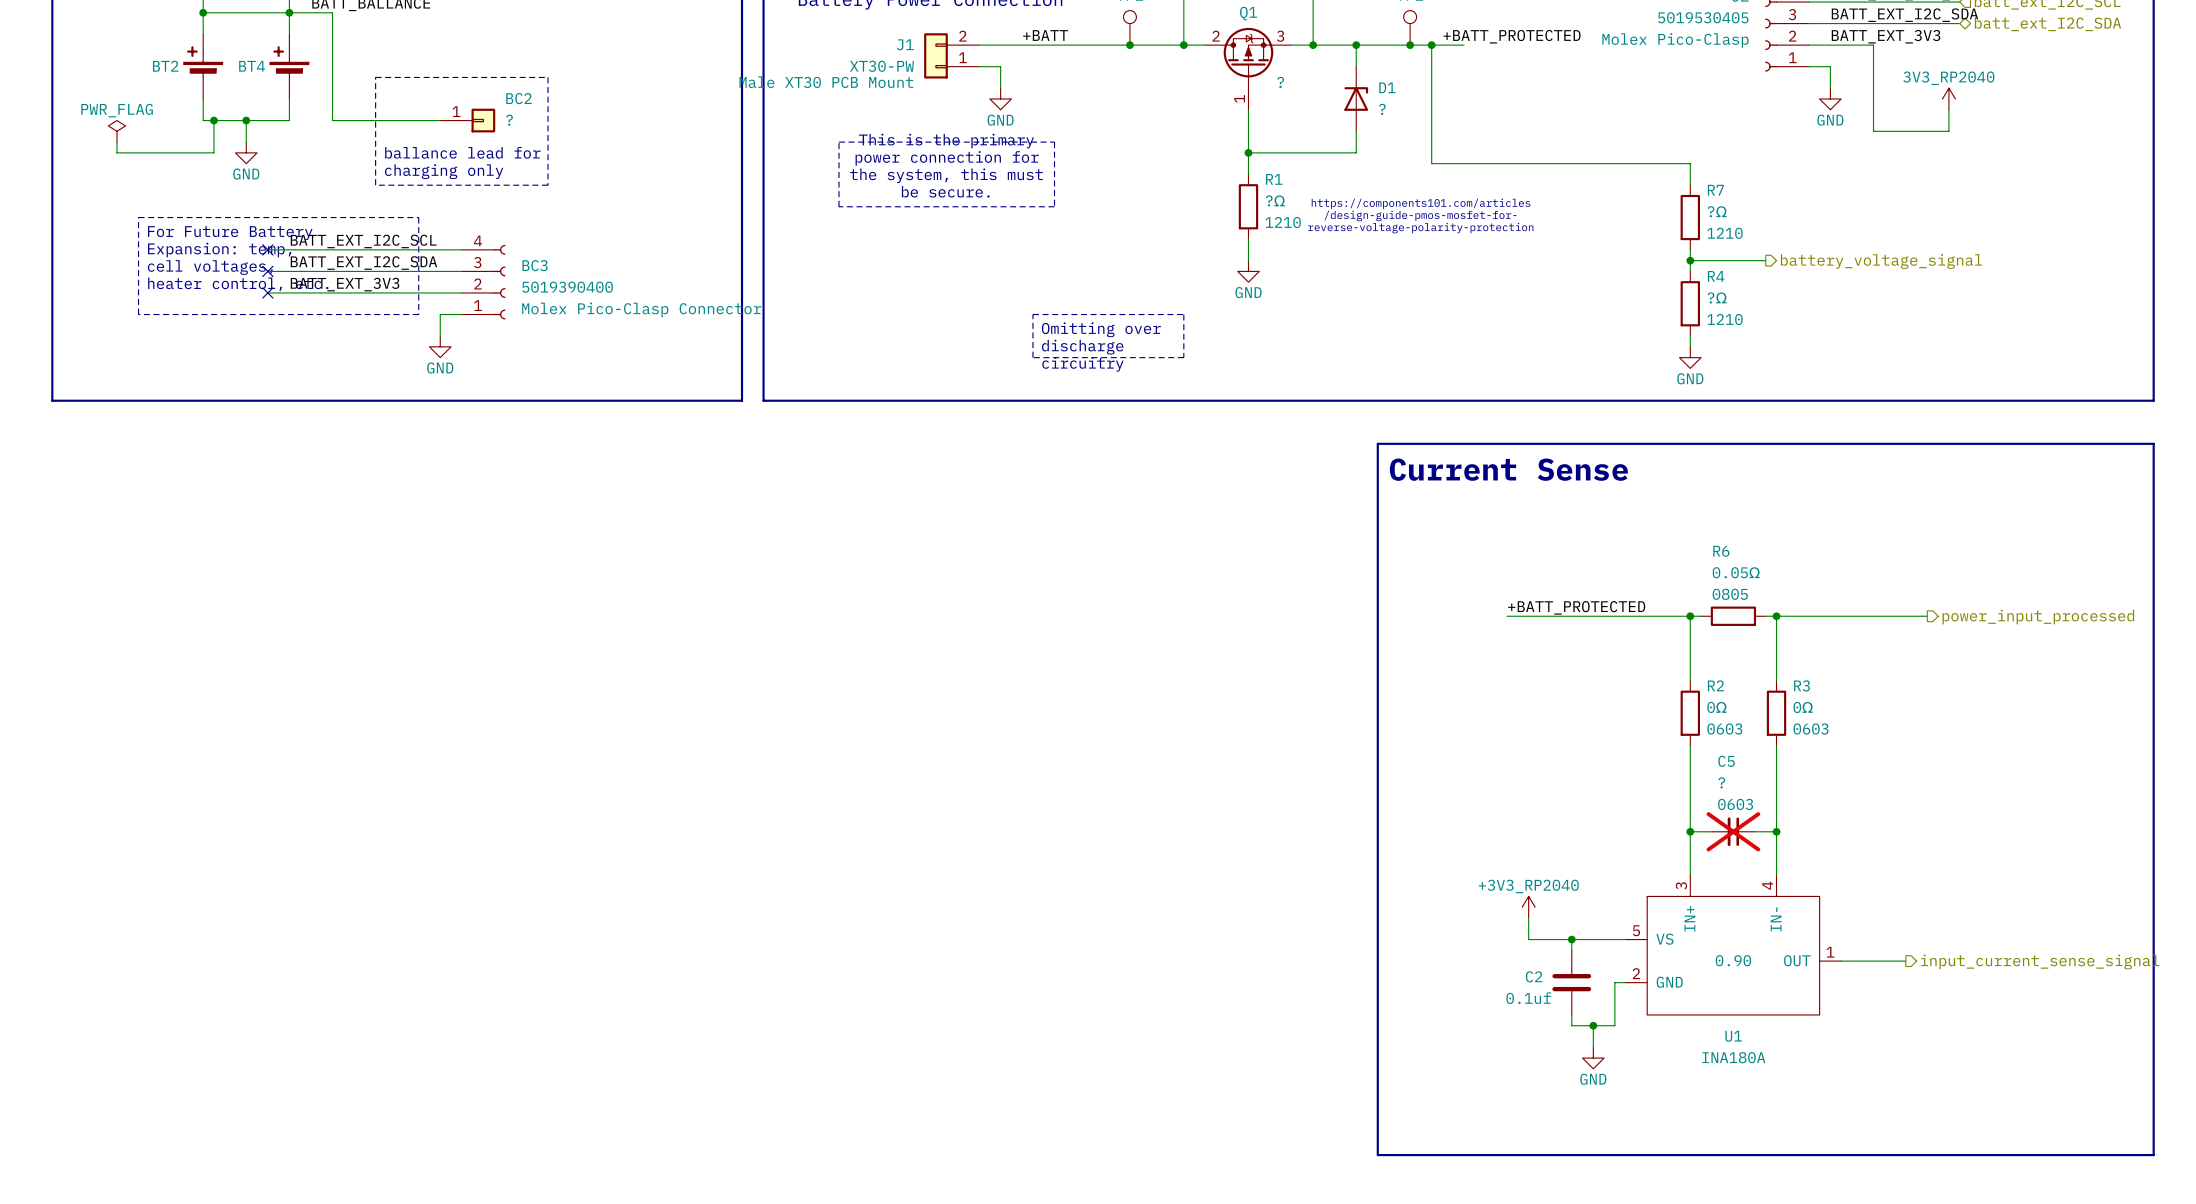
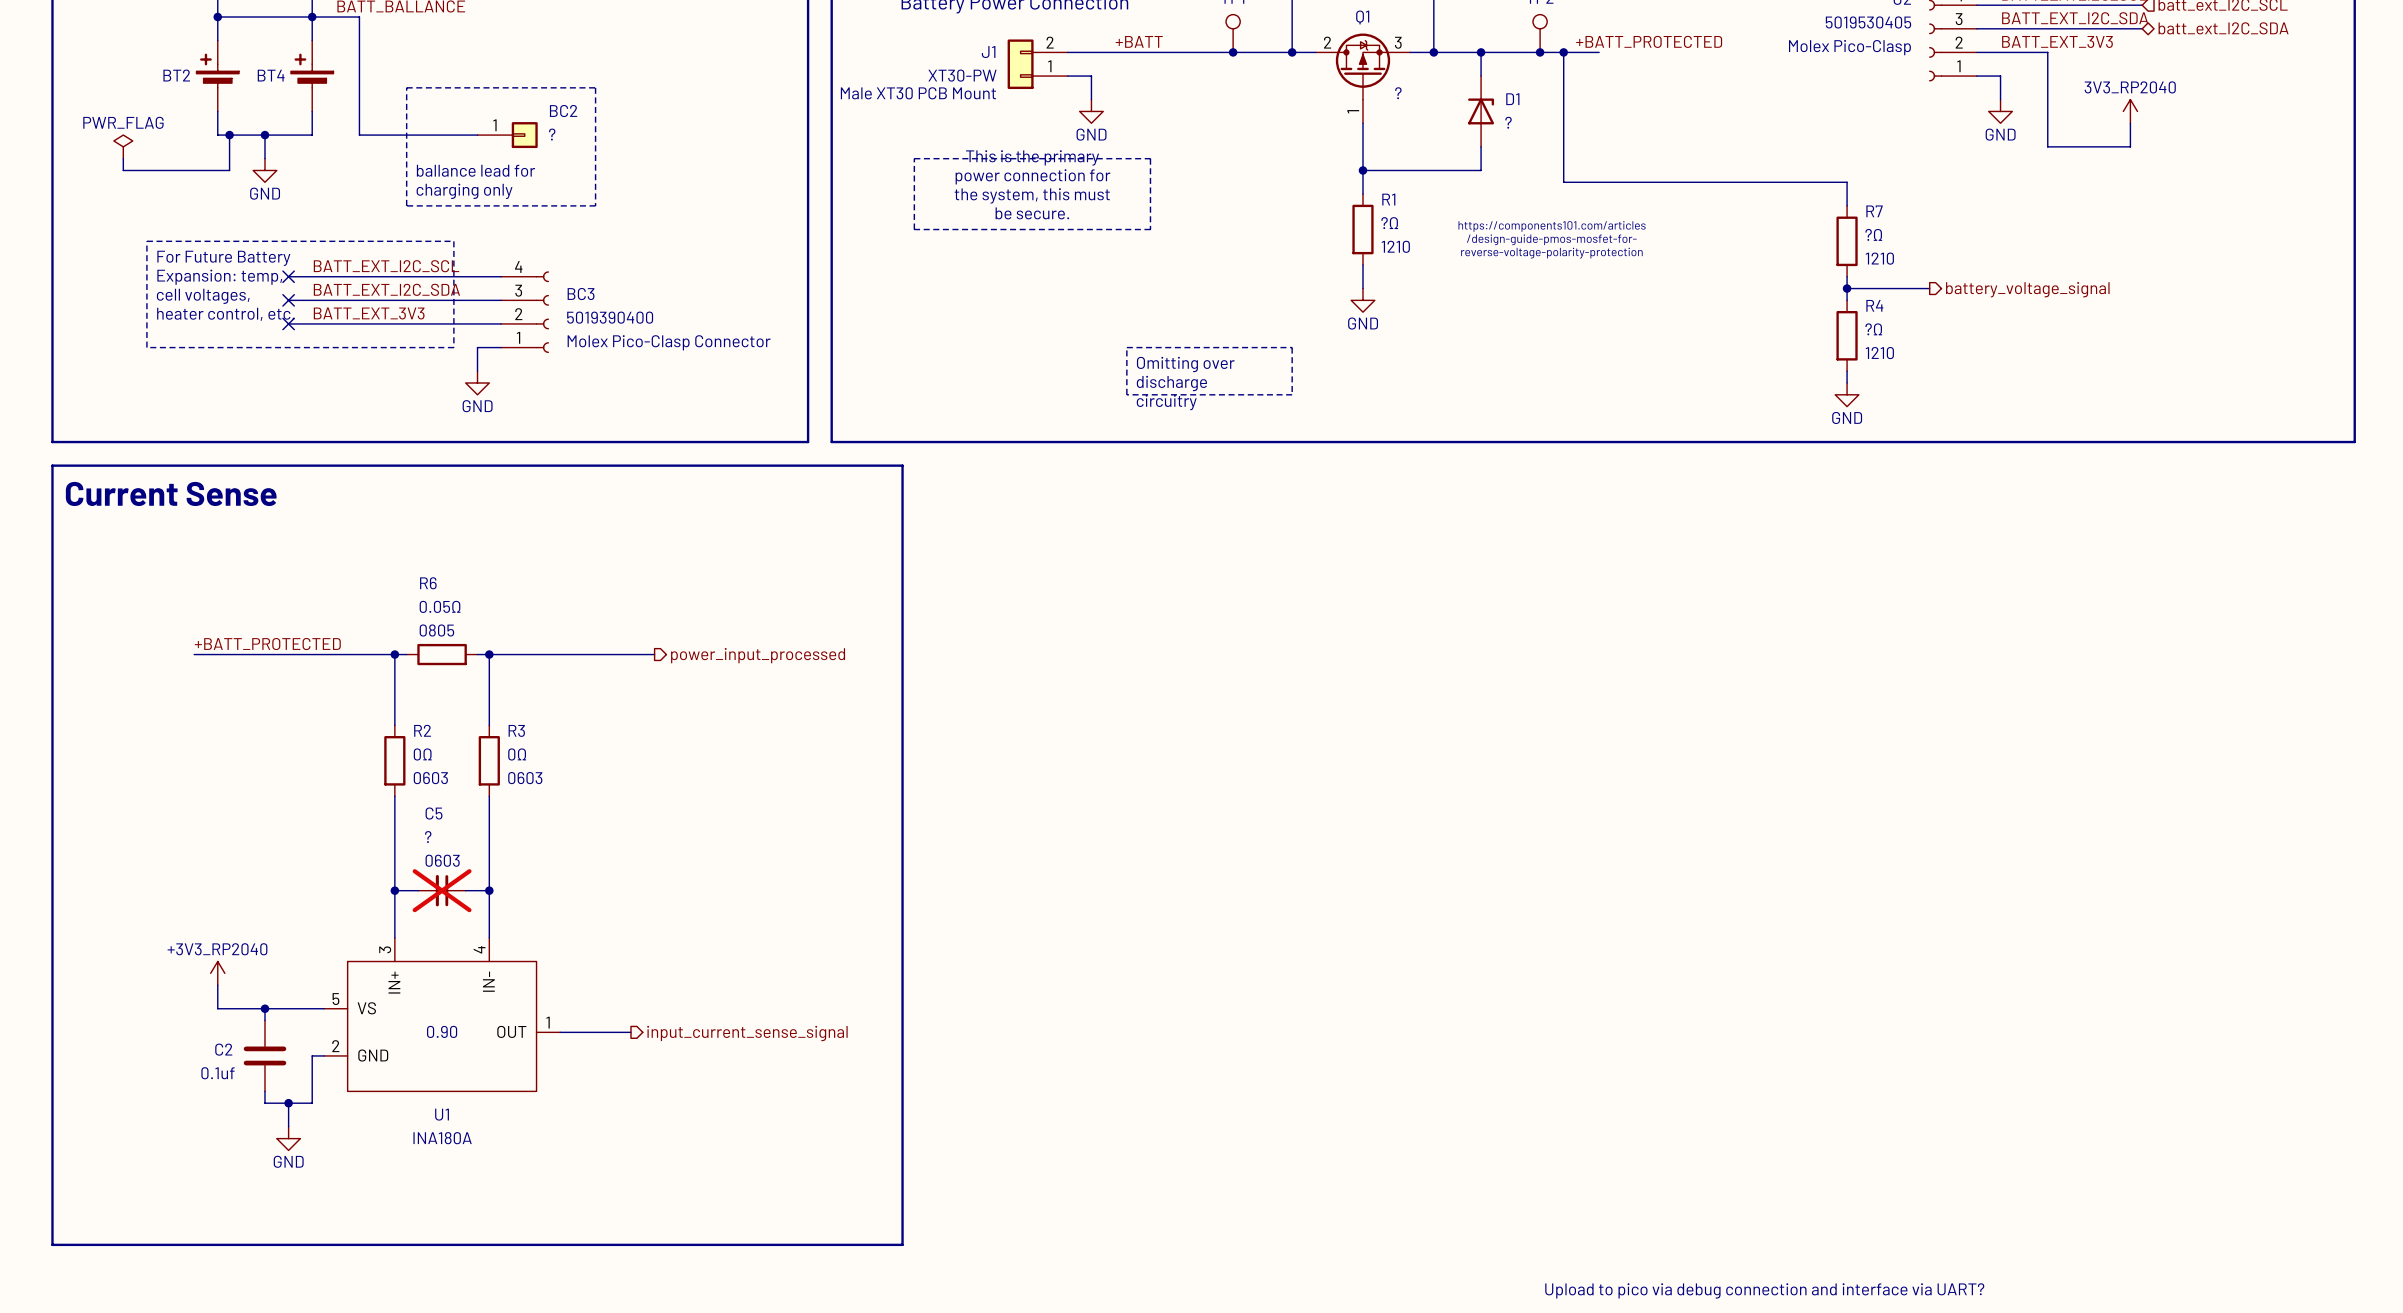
line: none -> (52, 465) (902, 465) (902, 1244) (52, 1244) (52, 465)
line: (1377, 443) (2153, 443) (2153, 1155) (1377, 1155) (1377, 443) -> none
text: none -> Current Sense (171, 493)
text: Current Sense (1508, 469) -> none
label: none -> +BATT_PROTECTED (267, 644)
wire: none -> (194, 654) (406, 654)
wire: none -> (394, 654) (394, 725)
junction: none -> (394, 654)
wire: none -> (477, 654) (654, 654)
wire: none -> (489, 654) (489, 725)
junction: none -> (489, 654)
hierarchical label: none -> power_input_processed (758, 655)
label: +BATT_PROTECTED (1576, 607) -> none
wire: (1507, 616) (1701, 616) -> none
wire: (1690, 616) (1690, 680) -> none
junction: (1690, 616) -> none
R6 position: (1733, 616) -> (442, 654)
wire: (1765, 616) (1927, 616) -> none
wire: (1776, 616) (1776, 680) -> none
junction: (1776, 616) -> none
hierarchical label: power_input_processed (2038, 617) -> none
R2 position: (1690, 713) -> (394, 760)
R3 position: (1776, 713) -> (489, 760)
wire: none -> (394, 796) (394, 937)
wire: none -> (489, 796) (489, 937)
wire: (1690, 745) (1690, 874) -> none
wire: (1776, 745) (1776, 874) -> none
wire: none -> (394, 890) (418, 890)
junction: none -> (394, 890)
wire: none -> (465, 890) (489, 890)
junction: none -> (489, 890)
wire: (1690, 831) (1711, 831) -> none
junction: (1690, 831) -> none
C5 position: (1733, 831) -> (442, 890)
wire: (1754, 831) (1776, 831) -> none
junction: (1776, 831) -> none
power symbol: none -> +3V3_RP2040 (217, 973)
wire: none -> (217, 985) (217, 1008) (324, 1008)
power symbol: +3V3_RP2040 (1528, 907) -> none
wire: none -> (264, 1008) (264, 1020)
junction: none -> (264, 1008)
wire: (1528, 917) (1528, 939) (1625, 939) -> none
wire: none -> (560, 1032) (630, 1032)
wire: (1571, 939) (1571, 950) -> none
junction: (1571, 939) -> none
hierarchical label: none -> input_current_sense_signal (747, 1033)
U1 position: (1733, 944) -> (442, 1014)
wire: none -> (324, 1055) (312, 1055) (312, 1103) (264, 1103) (264, 1091)
wire: (1841, 961) (1905, 961) -> none
hierarchical label: input_current_sense_signal (2040, 961) -> none
C2 position: (1571, 982) -> (264, 1055)
wire: (1625, 982) (1614, 982) (1614, 1025) (1571, 1025) (1571, 1014) -> none
wire: none -> (288, 1103) (288, 1126)
junction: none -> (288, 1103)
wire: (1593, 1025) (1593, 1047) -> none
junction: (1593, 1025) -> none
power symbol: none -> GND (288, 1138)
power symbol: GND (1593, 1058) -> none
text: none -> Upload to pico via debug connection and interface via UART? (1764, 1290)

